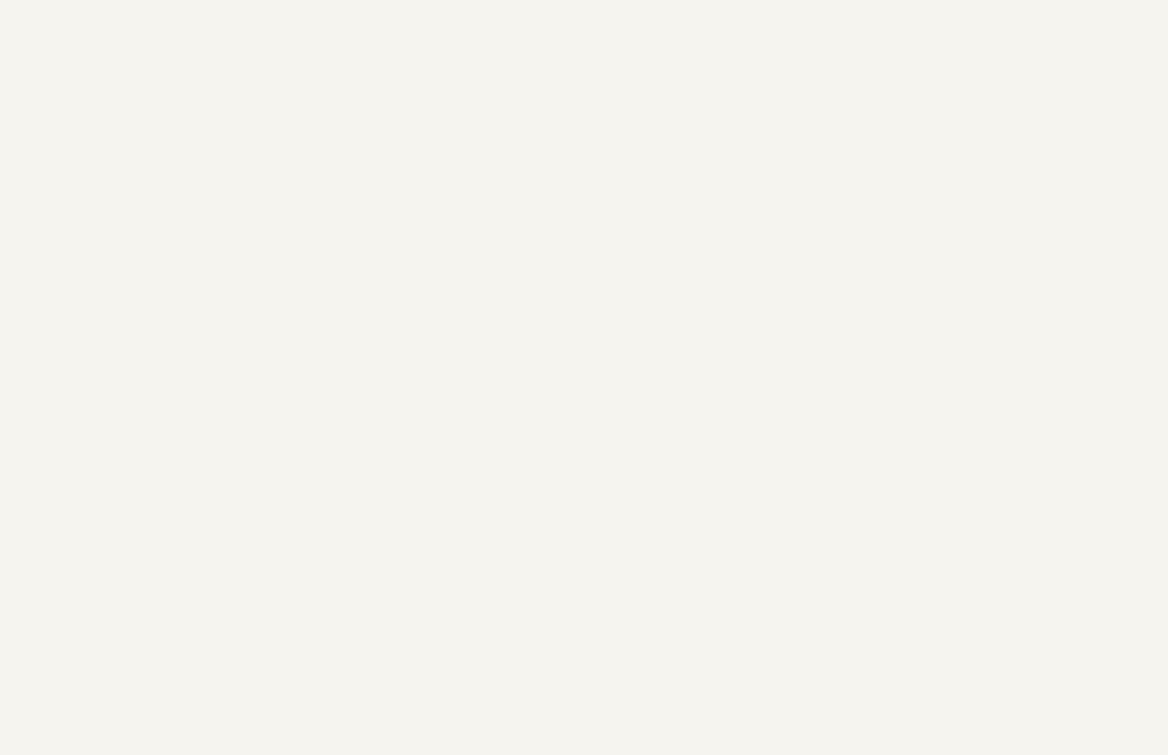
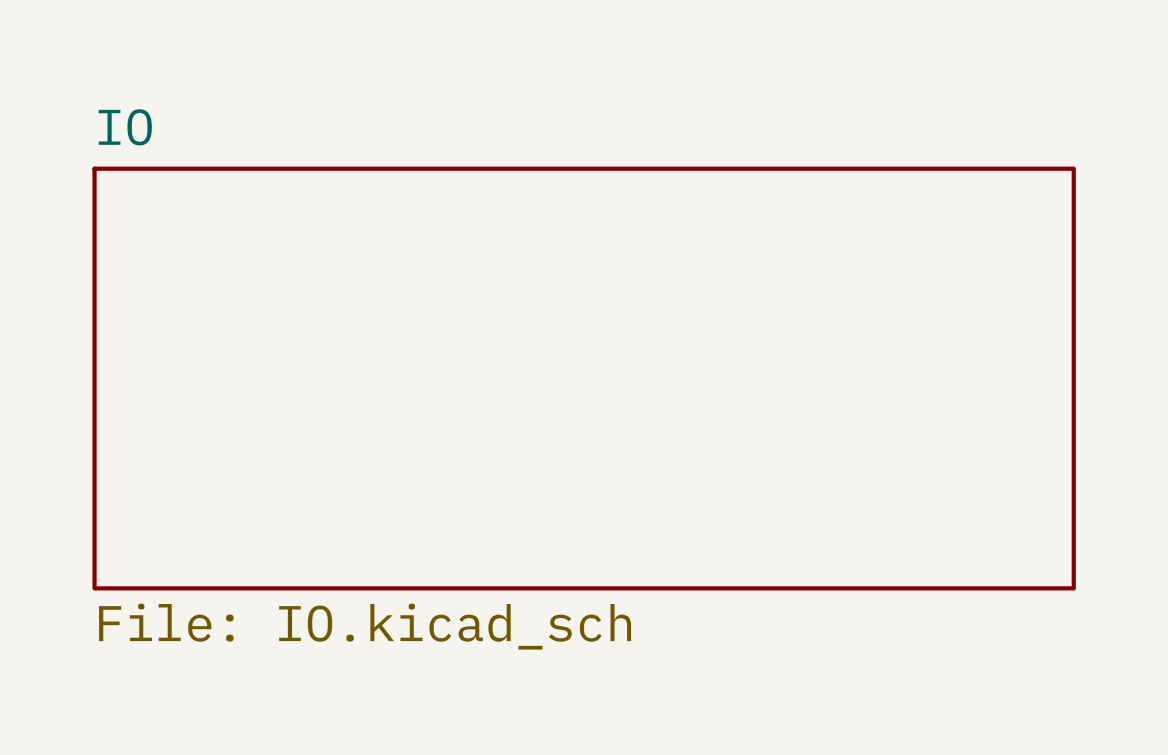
sheet IO: none -> File: IO.kicad_sch (584, 378)

